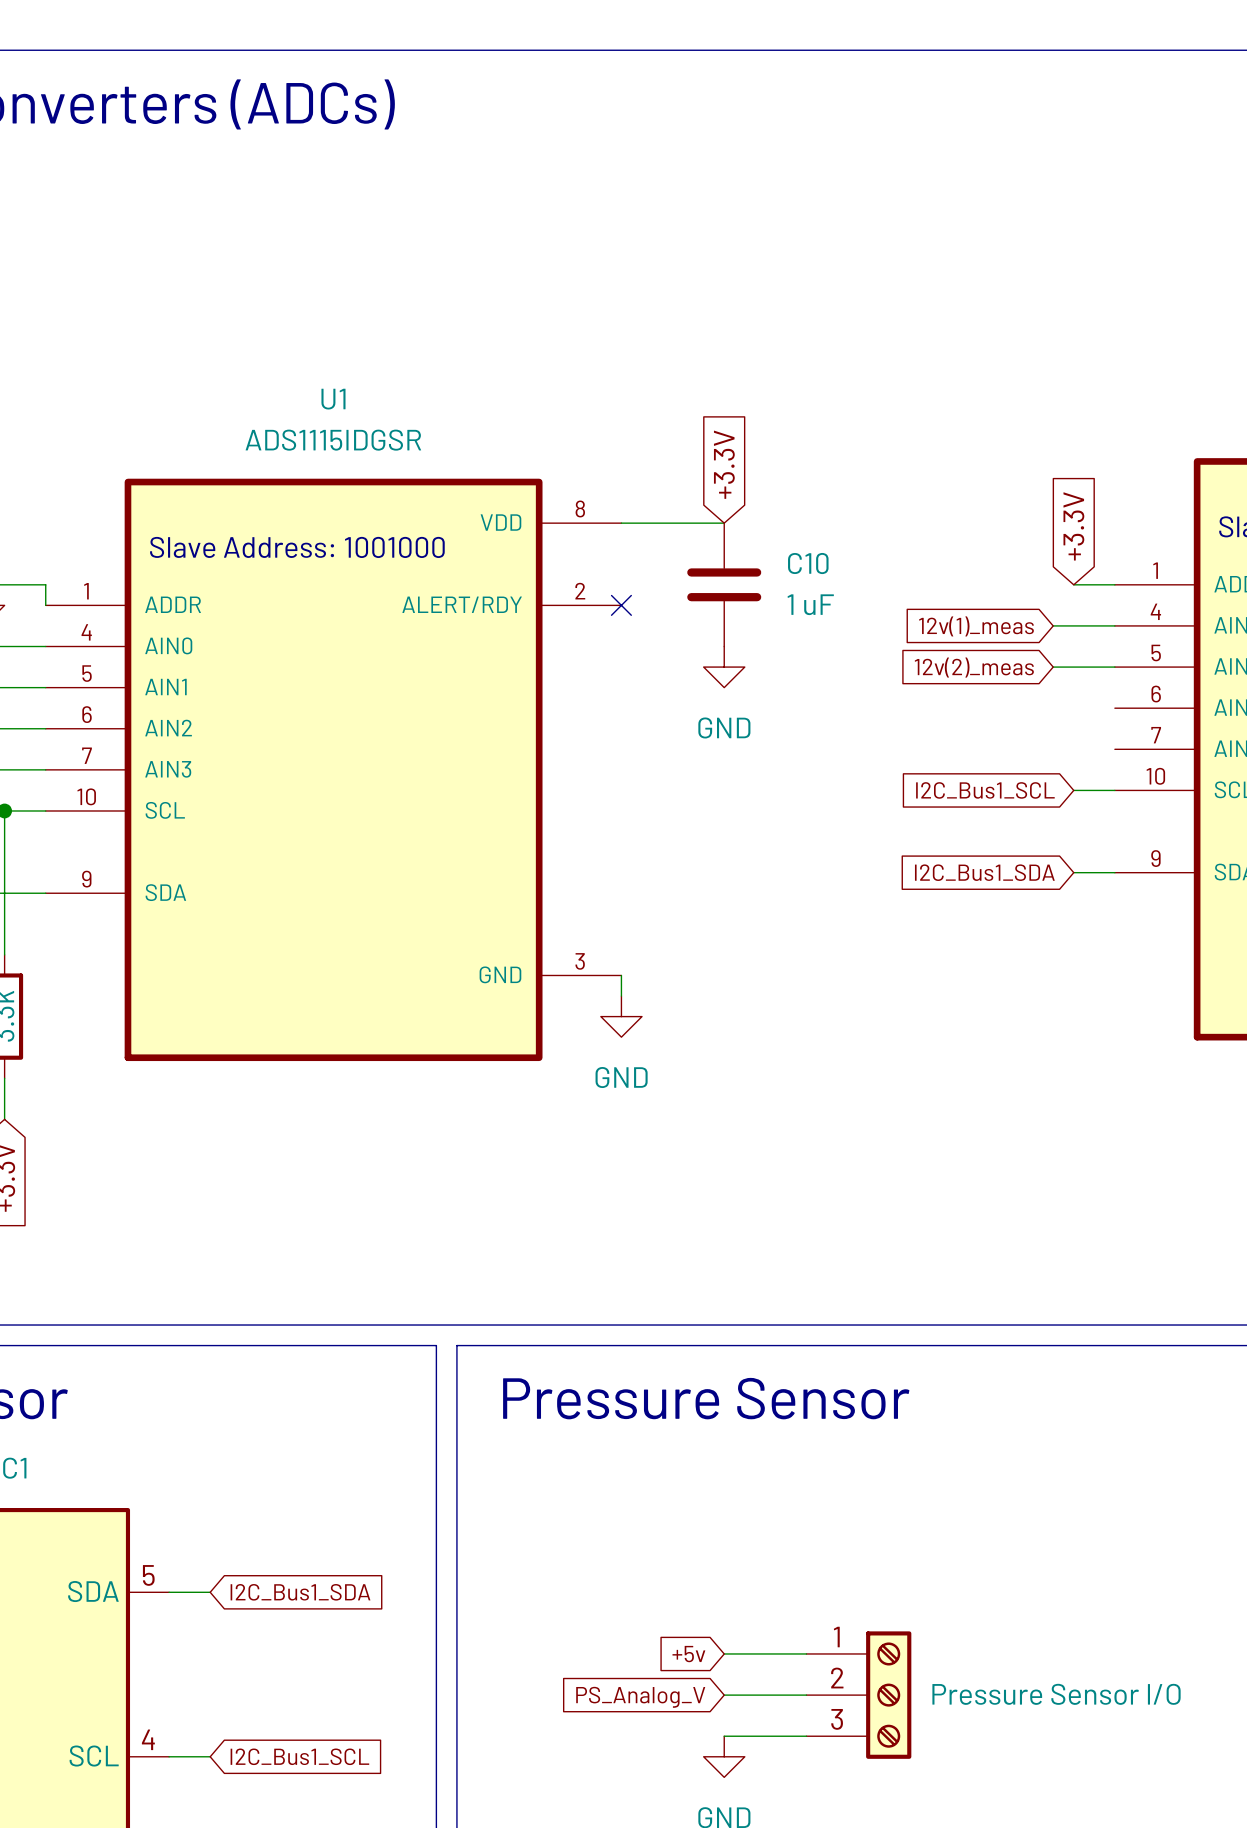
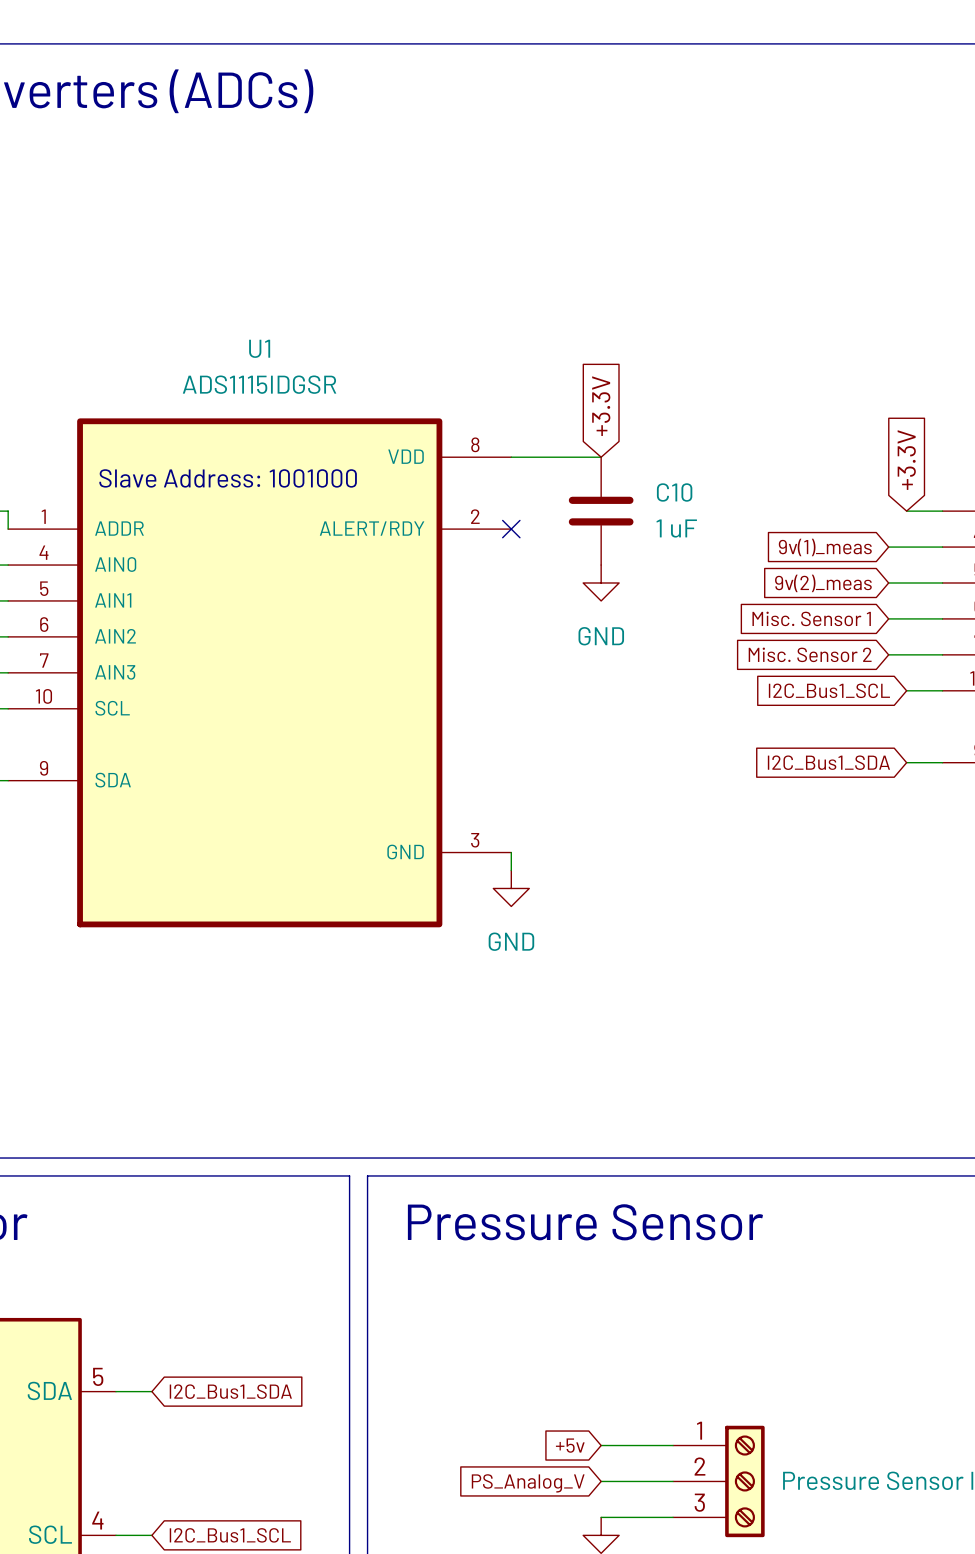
global label: 12v(1)_meas (976, 626) -> 9v(1)_meas (825, 547)
global label: 12v(2)_meas (974, 667) -> 9v(2)_meas (823, 583)
global label: none -> Misc. Sensor 1 (811, 618)
wire: none -> (888, 618) (942, 618)
global label: none -> Misc. Sensor 2 (810, 654)
wire: none -> (888, 654) (942, 654)

